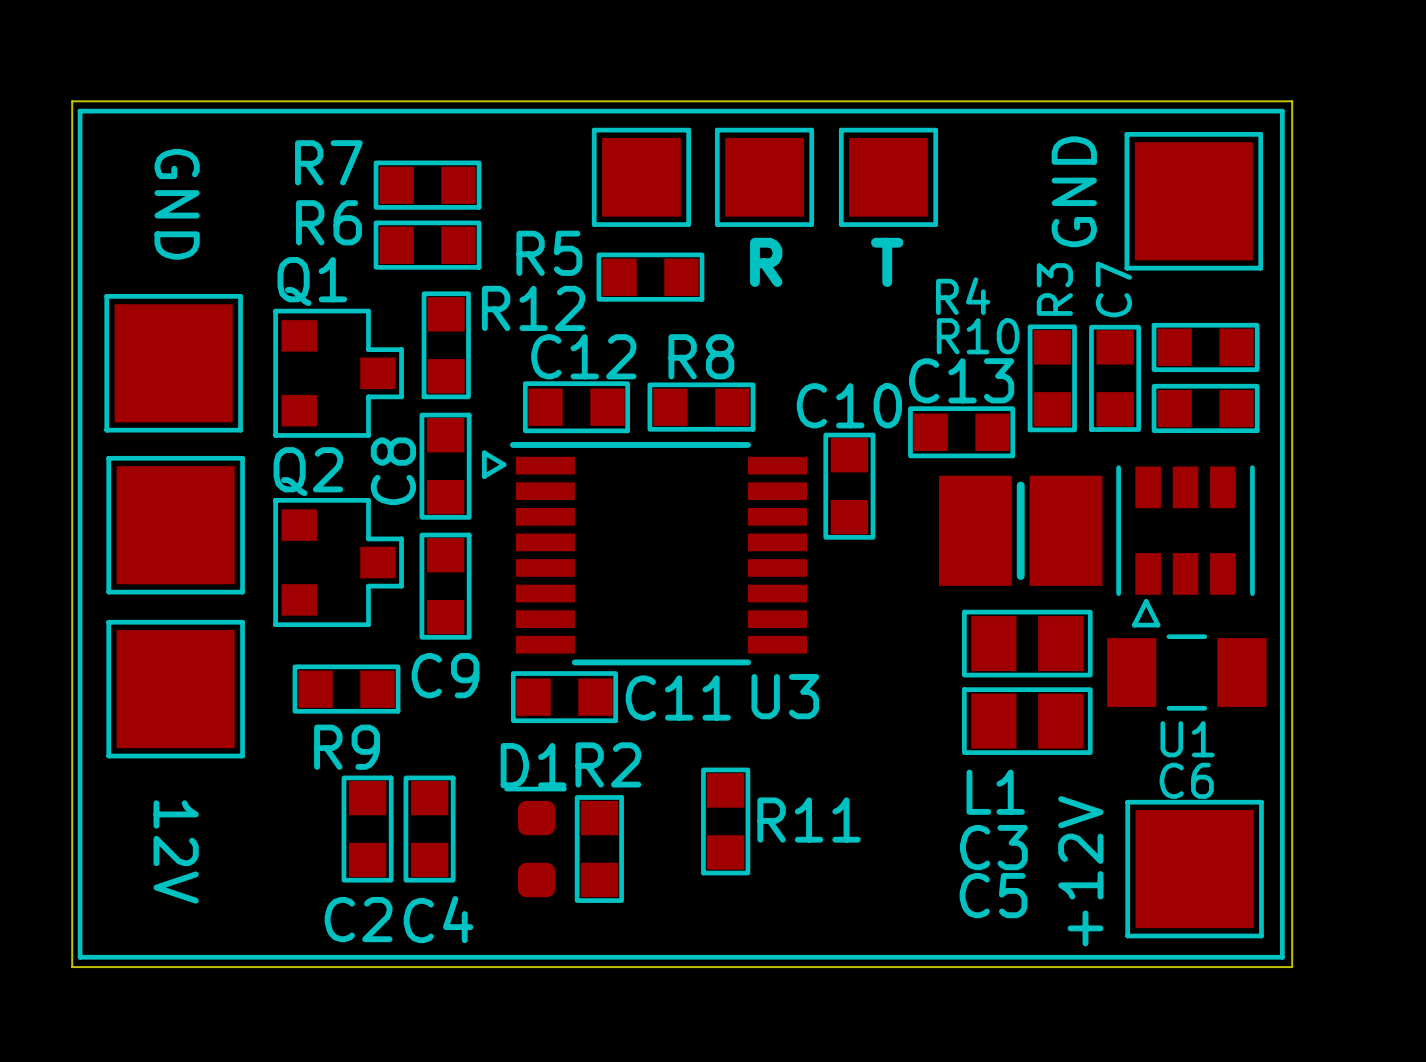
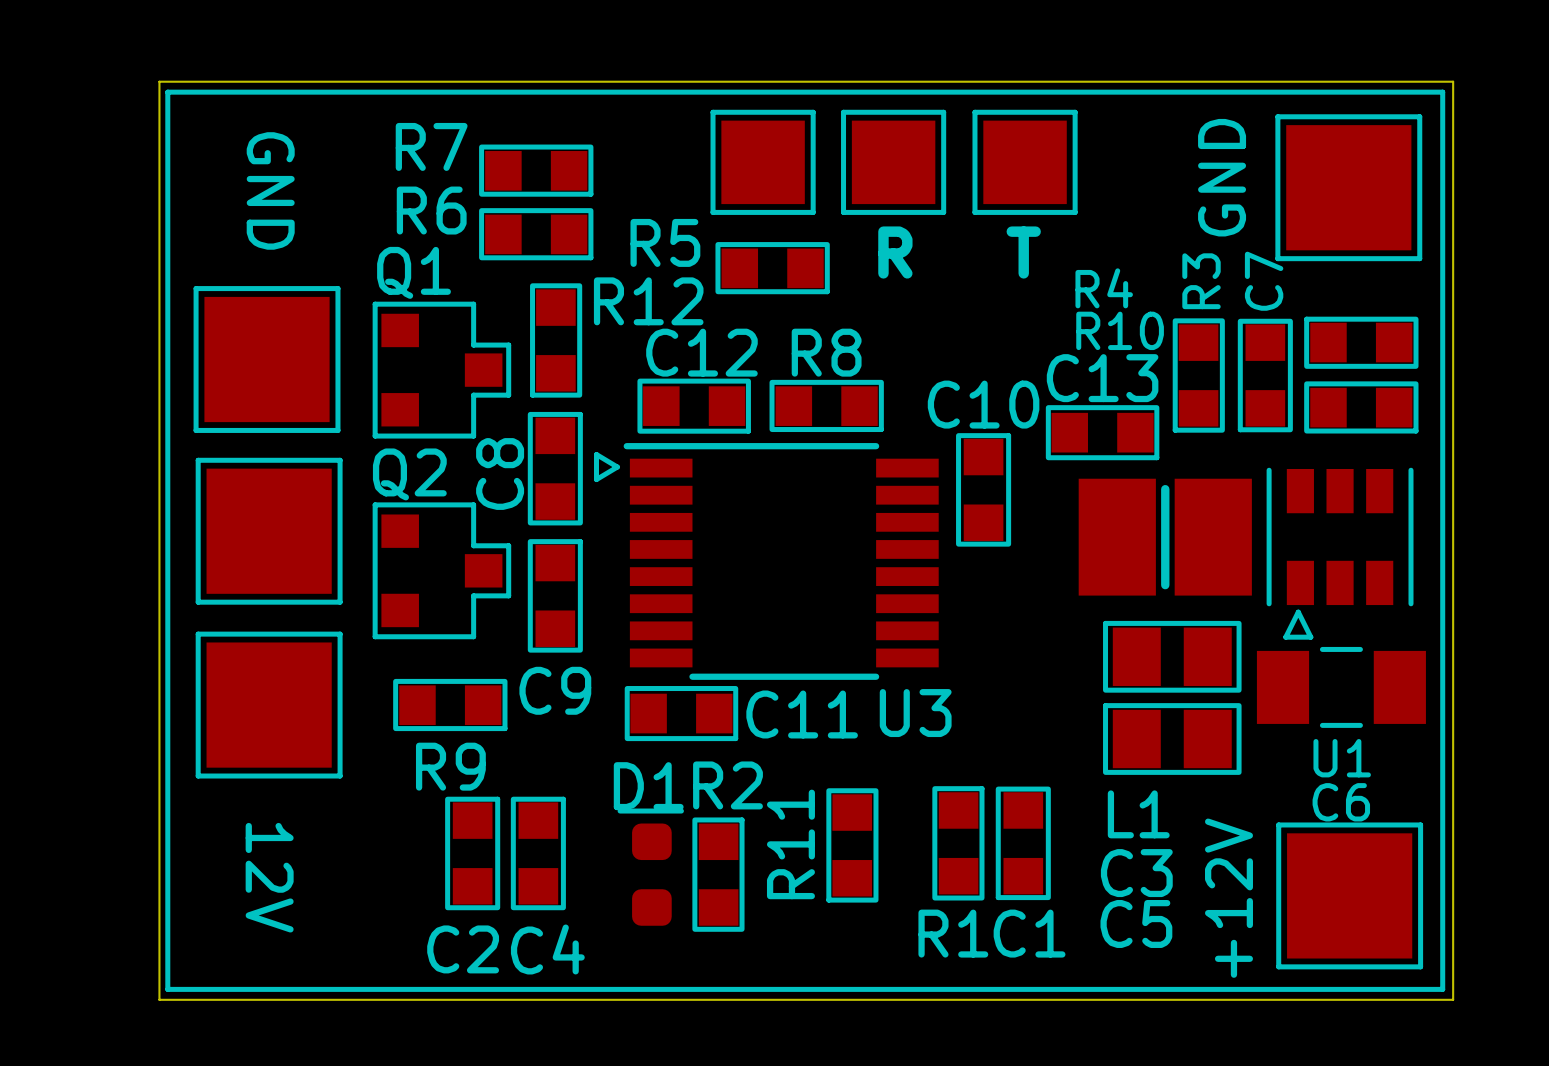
R1: none -> (958, 843)
C1: none -> (1023, 843)
R11 name rotation: 0° (809, 820) -> 90° counterclockwise (790, 844)
R11 name position: R11 (809, 820) -> R11 (790, 844)

